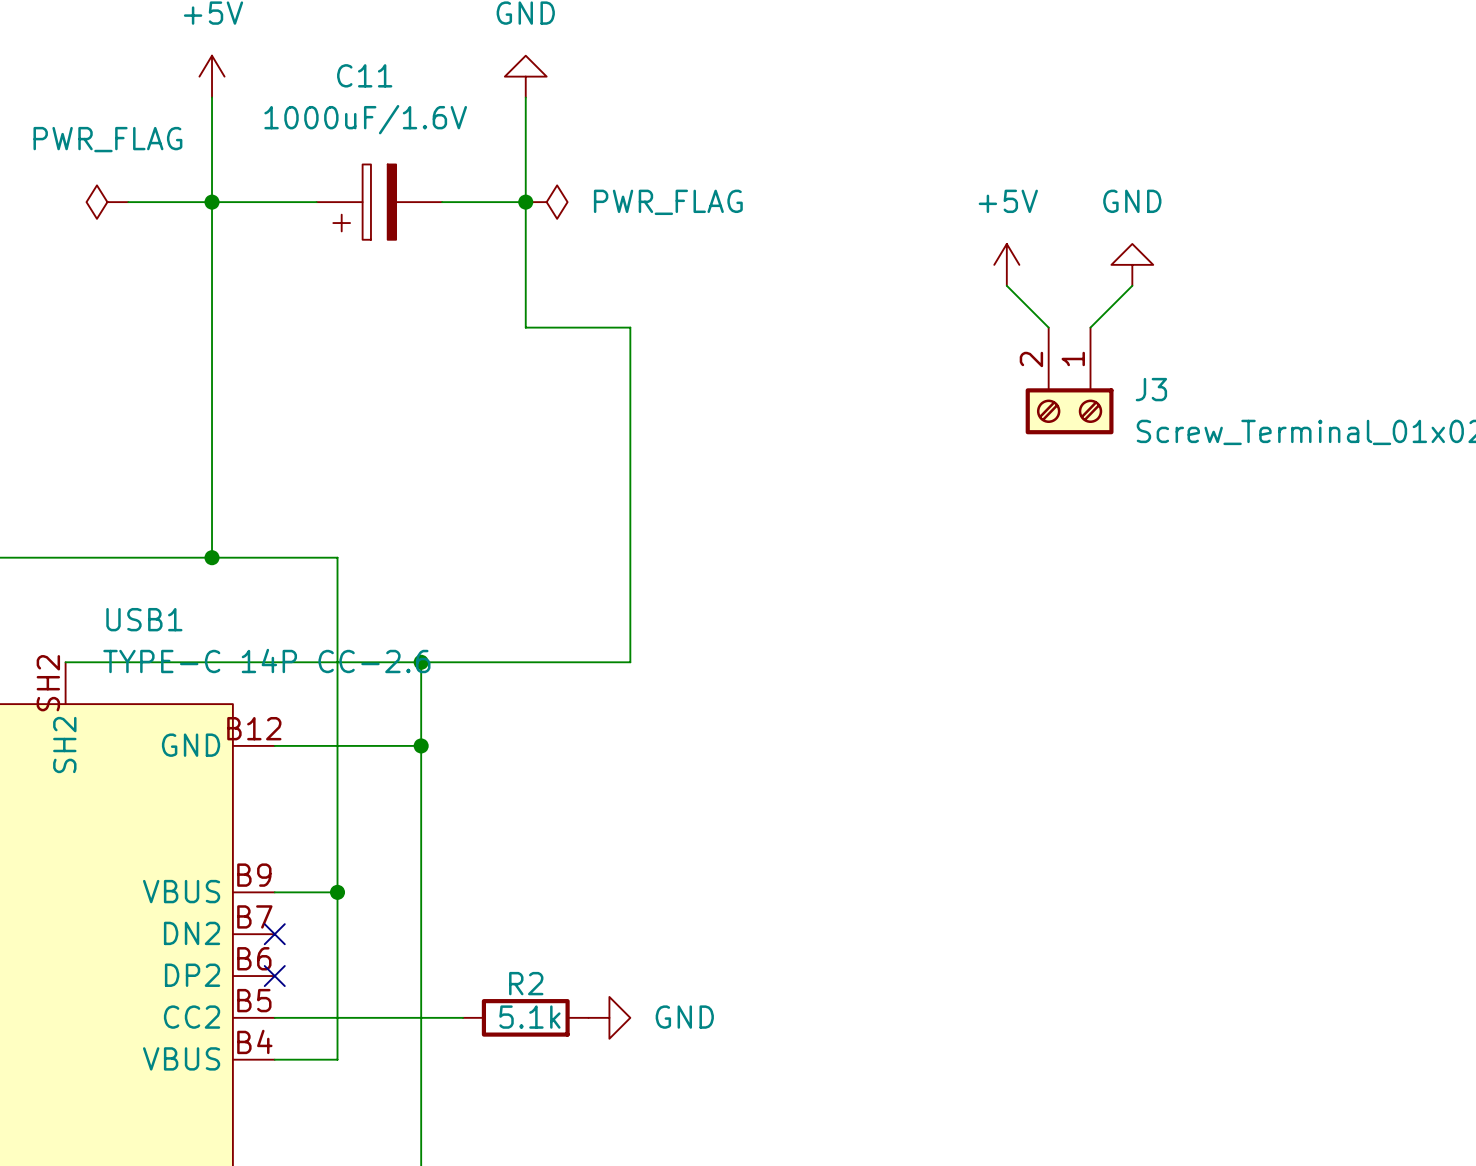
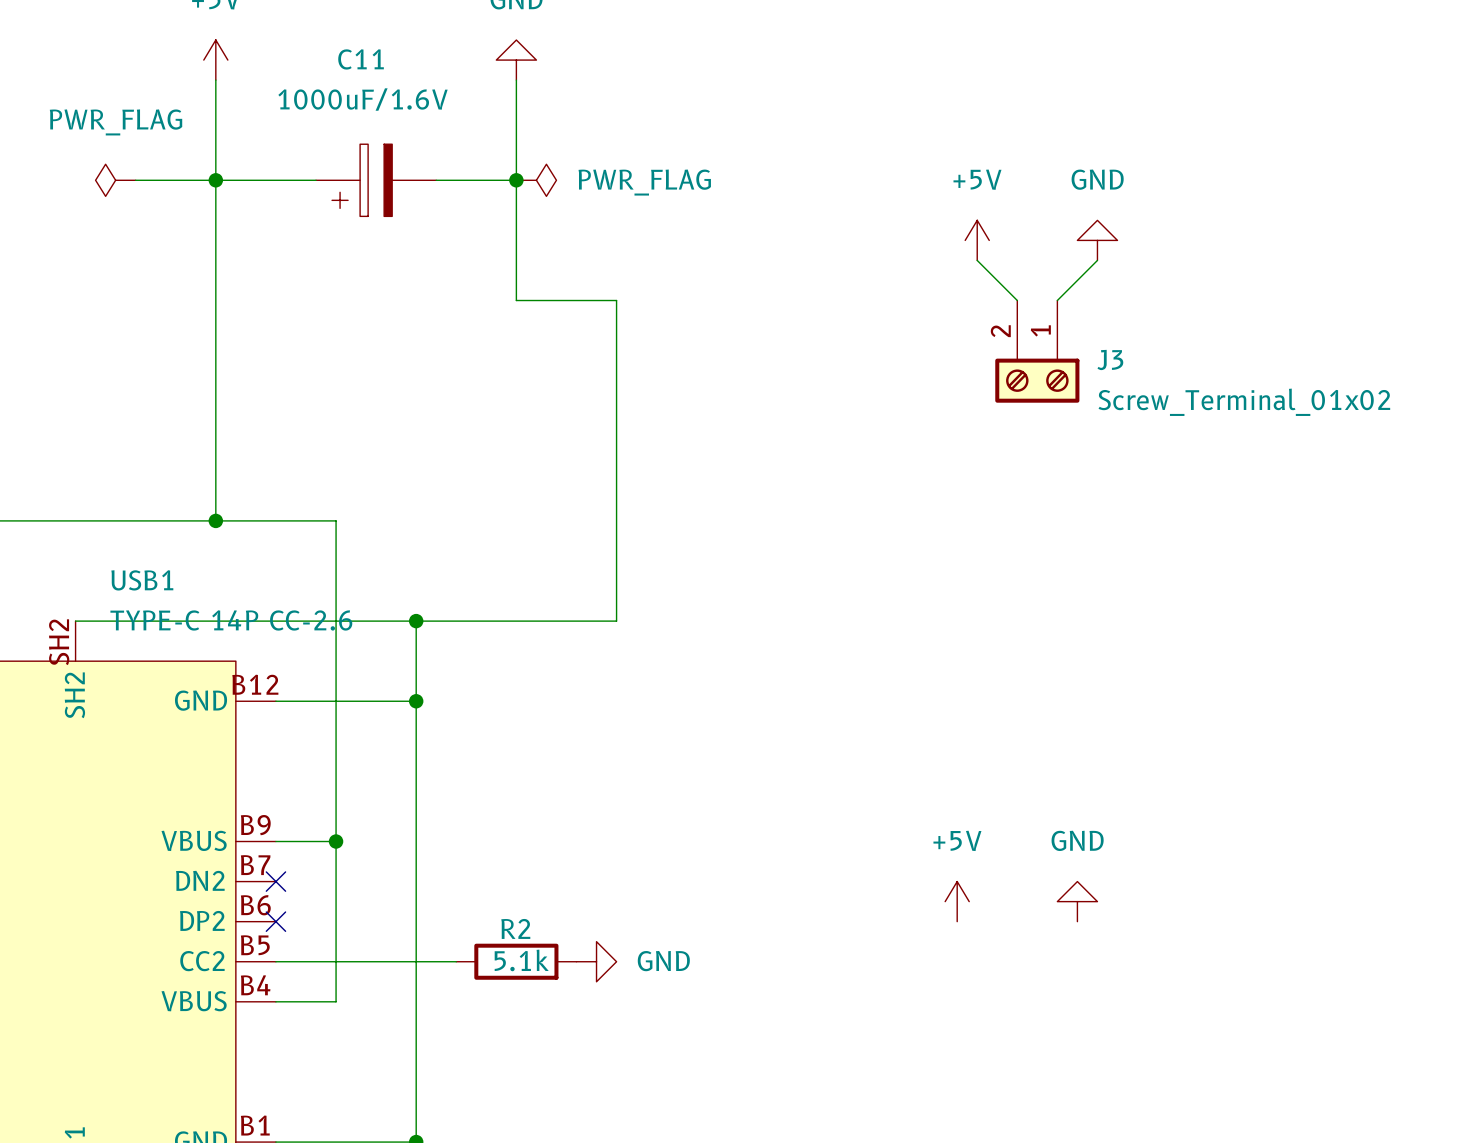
power symbol: none -> +5V (957, 901)
power symbol: none -> GND (1077, 901)

